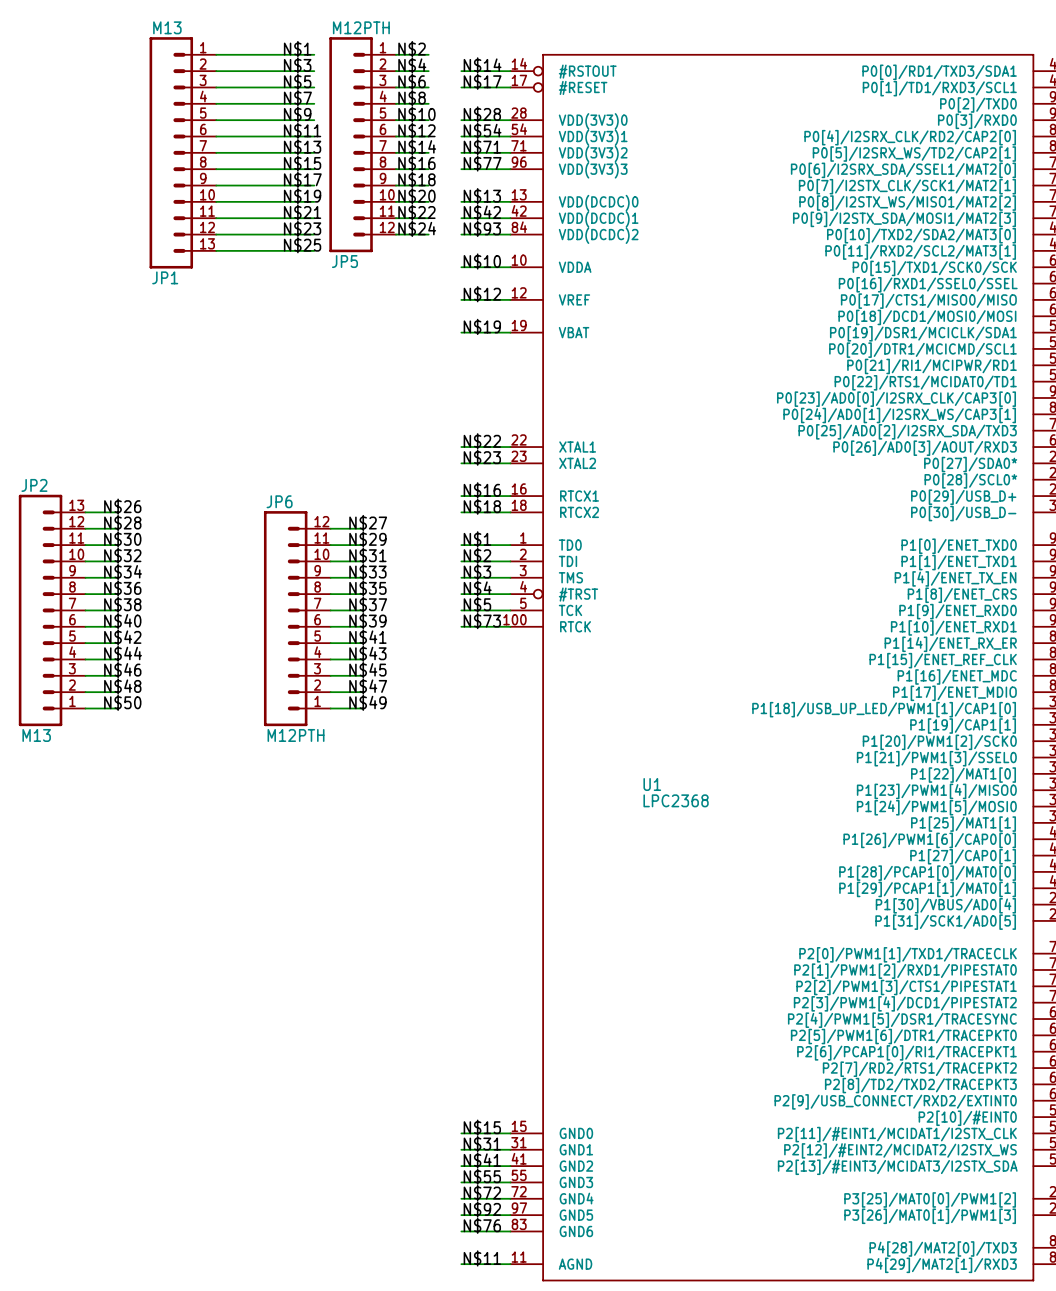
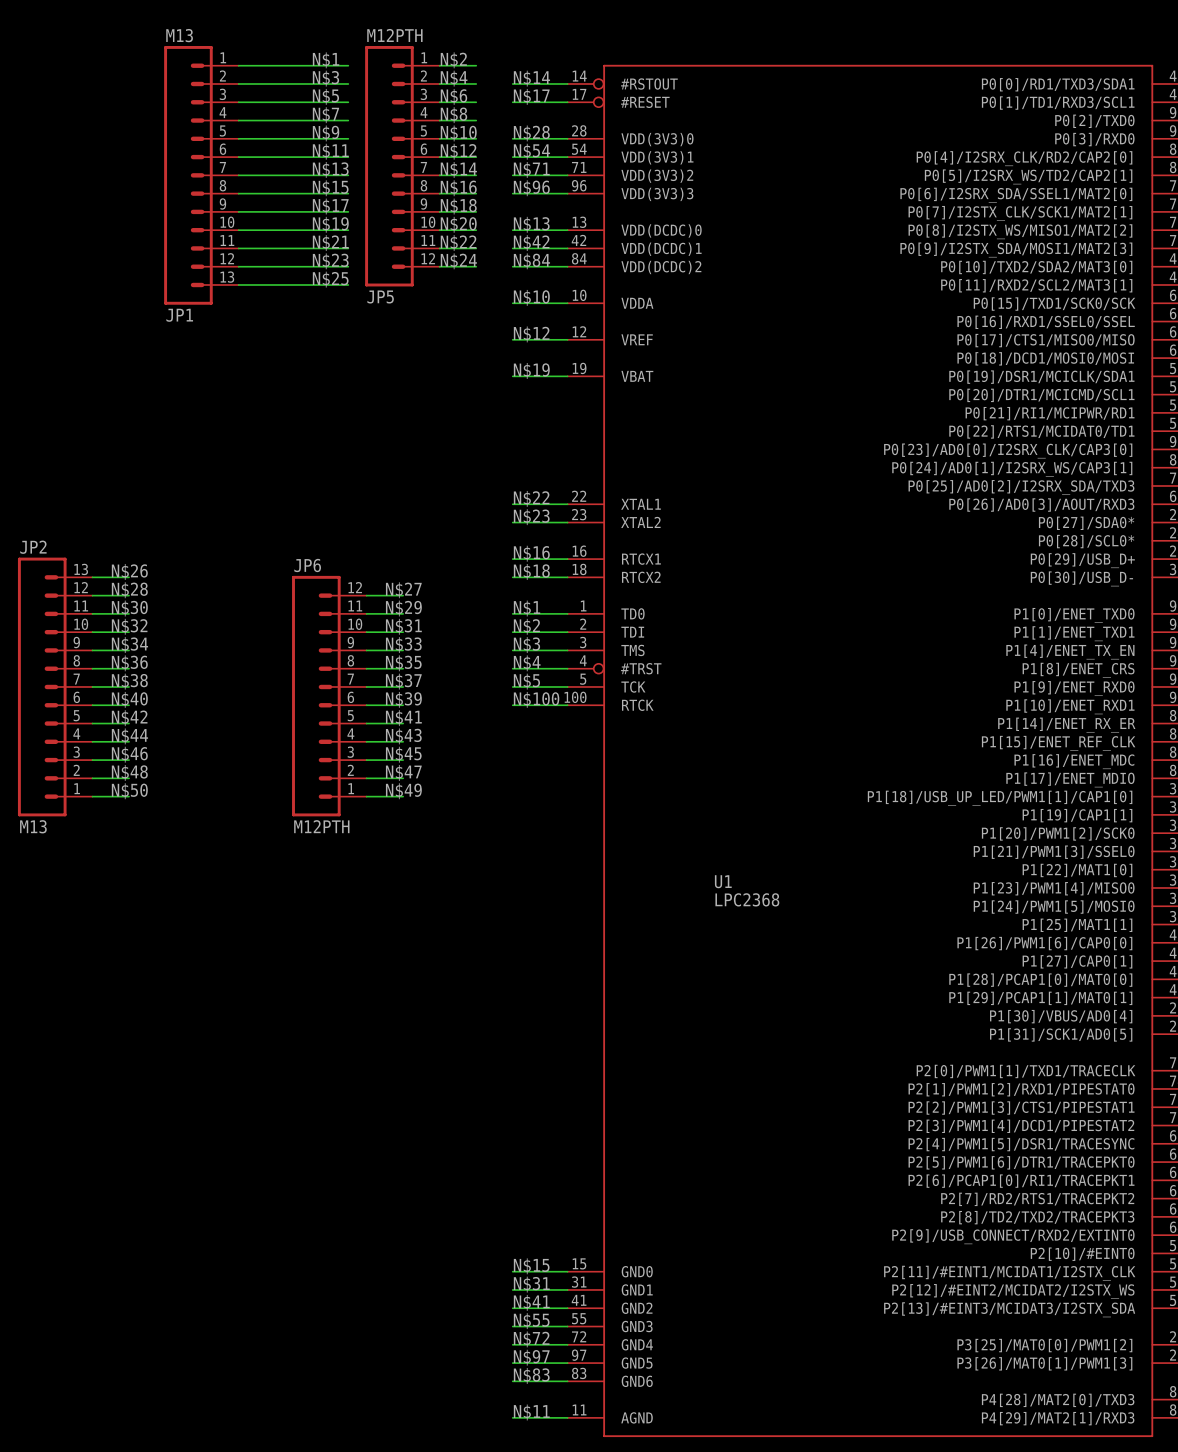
label: N$77 (482, 163) -> N$96 (531, 188)
label: N$93 (482, 228) -> N$84 (531, 261)
label: N$73 (482, 621) -> N$100 (536, 699)
label: N$92 (482, 1209) -> N$97 (531, 1357)
label: N$76 (482, 1225) -> N$83 (531, 1375)

